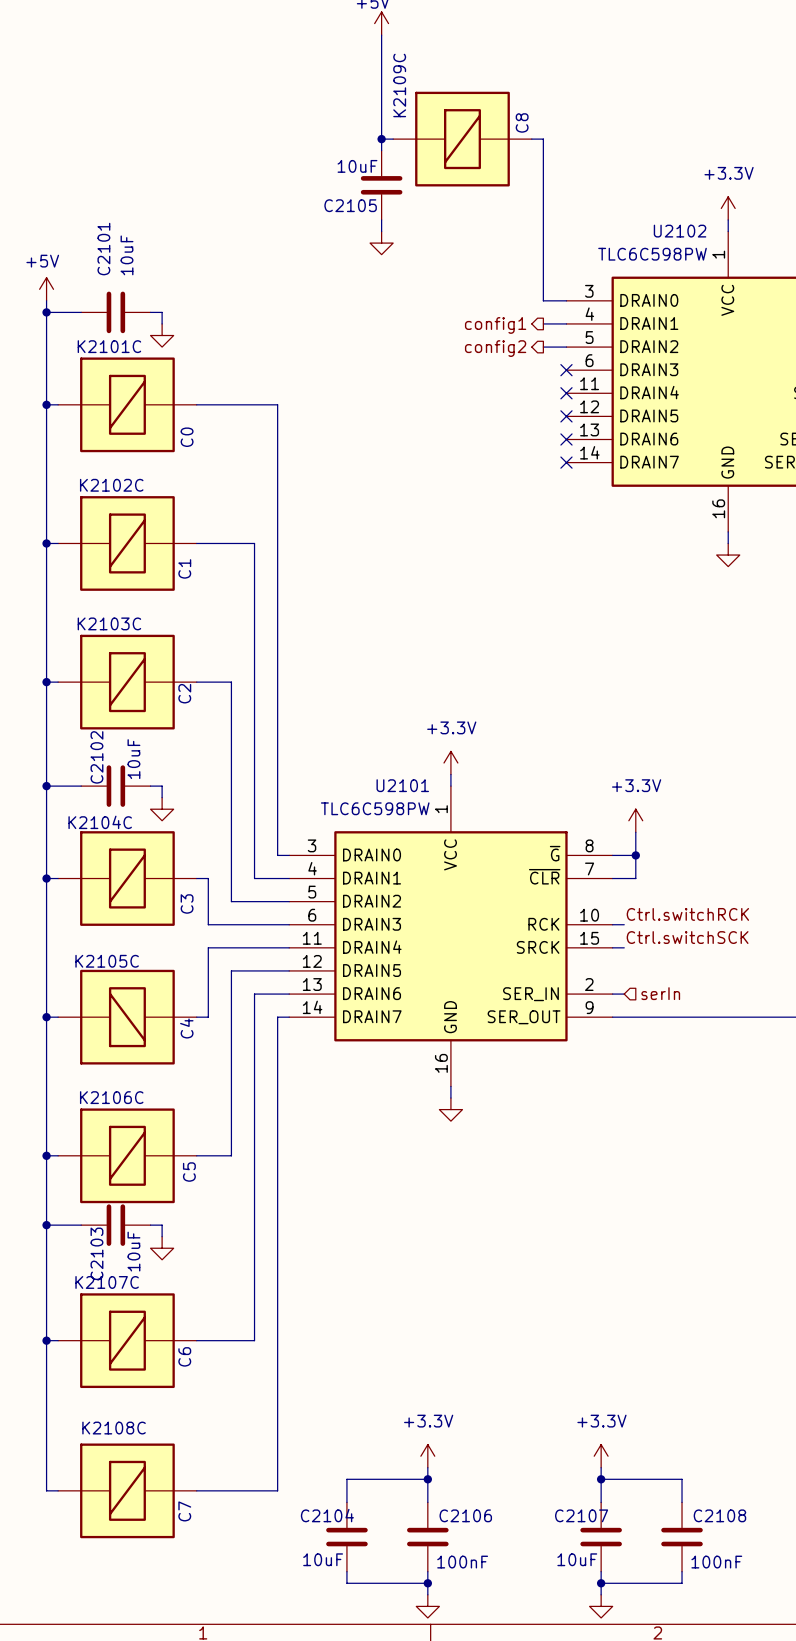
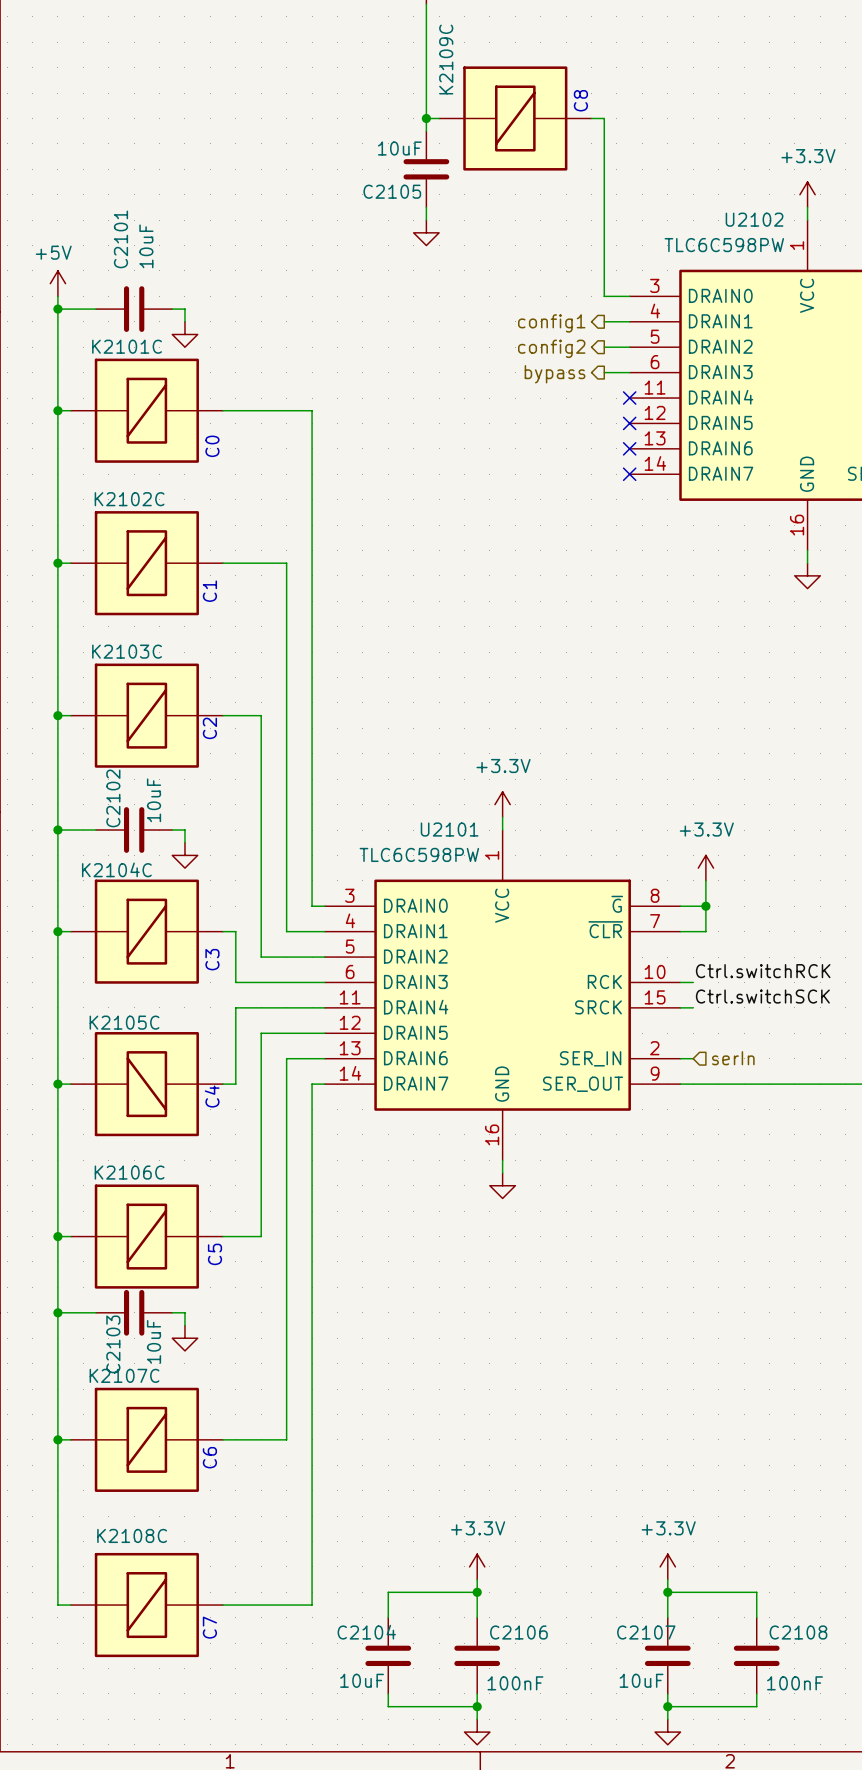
wire: none -> (604, 372) (629, 372)
no-connect mark: (566, 370) -> none
hierarchical label: none -> bypass (555, 374)

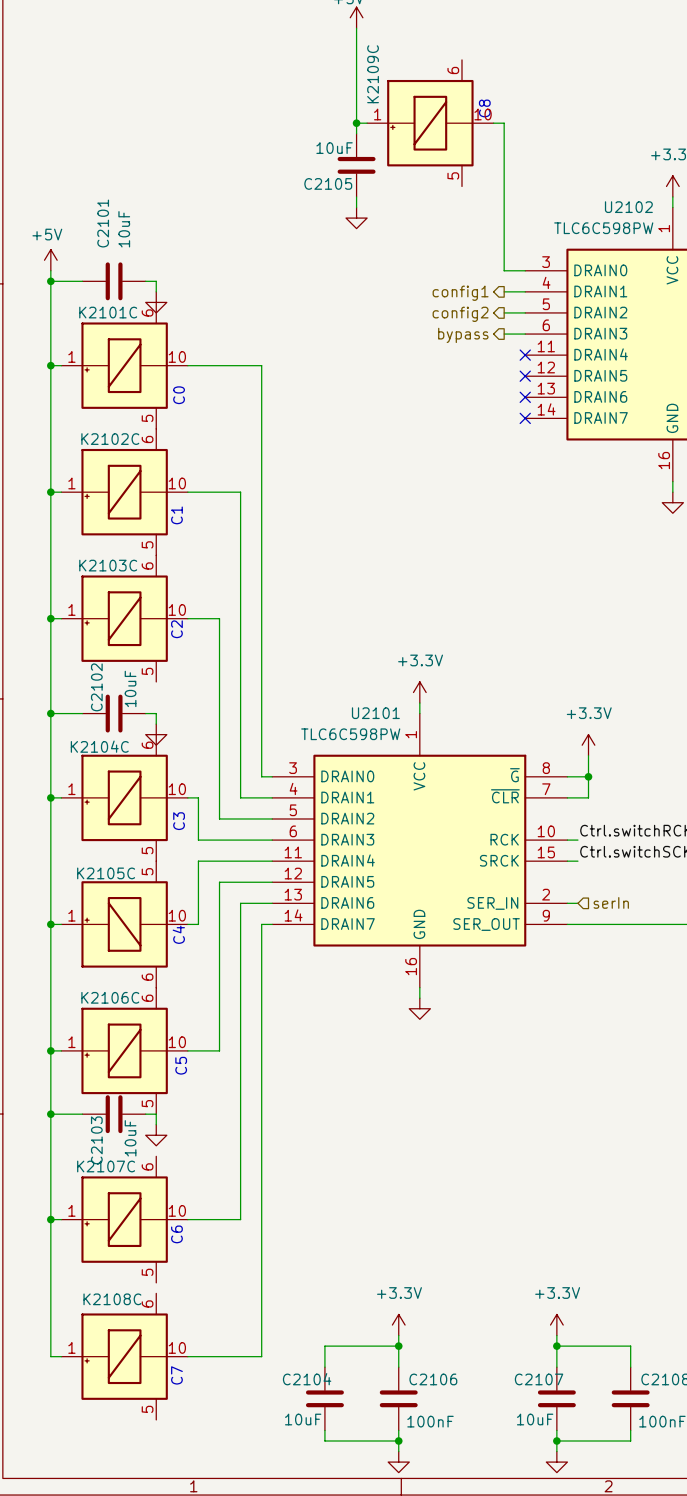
K2109C symbol: [439, 66, 592, 171] -> [367, 59, 494, 187]
K2101C symbol: [70, 358, 224, 463] -> [61, 302, 188, 429]
K2102C symbol: [70, 511, 224, 616] -> [61, 428, 188, 556]
K2103C symbol: [70, 663, 224, 768] -> [61, 555, 188, 682]
K2104C symbol: [70, 879, 224, 984] -> [61, 734, 188, 862]
K2105C symbol: [70, 1032, 224, 1137] -> [61, 861, 188, 988]
K2106C symbol: [70, 1184, 224, 1289] -> [61, 987, 188, 1115]
K2107C symbol: [70, 1387, 224, 1492] -> [61, 1156, 188, 1283]
K2108C symbol: [70, 1552, 224, 1658] -> [61, 1293, 188, 1420]

